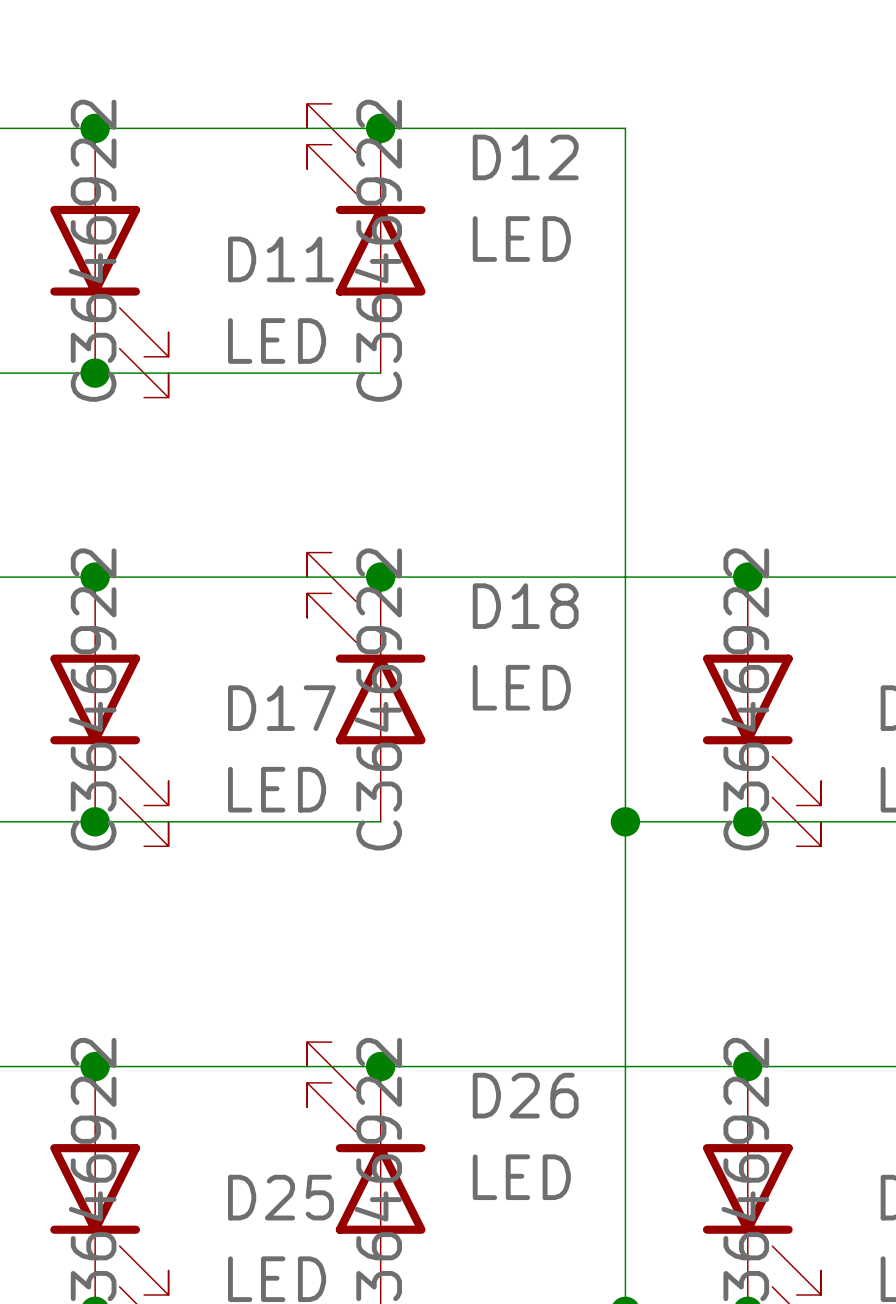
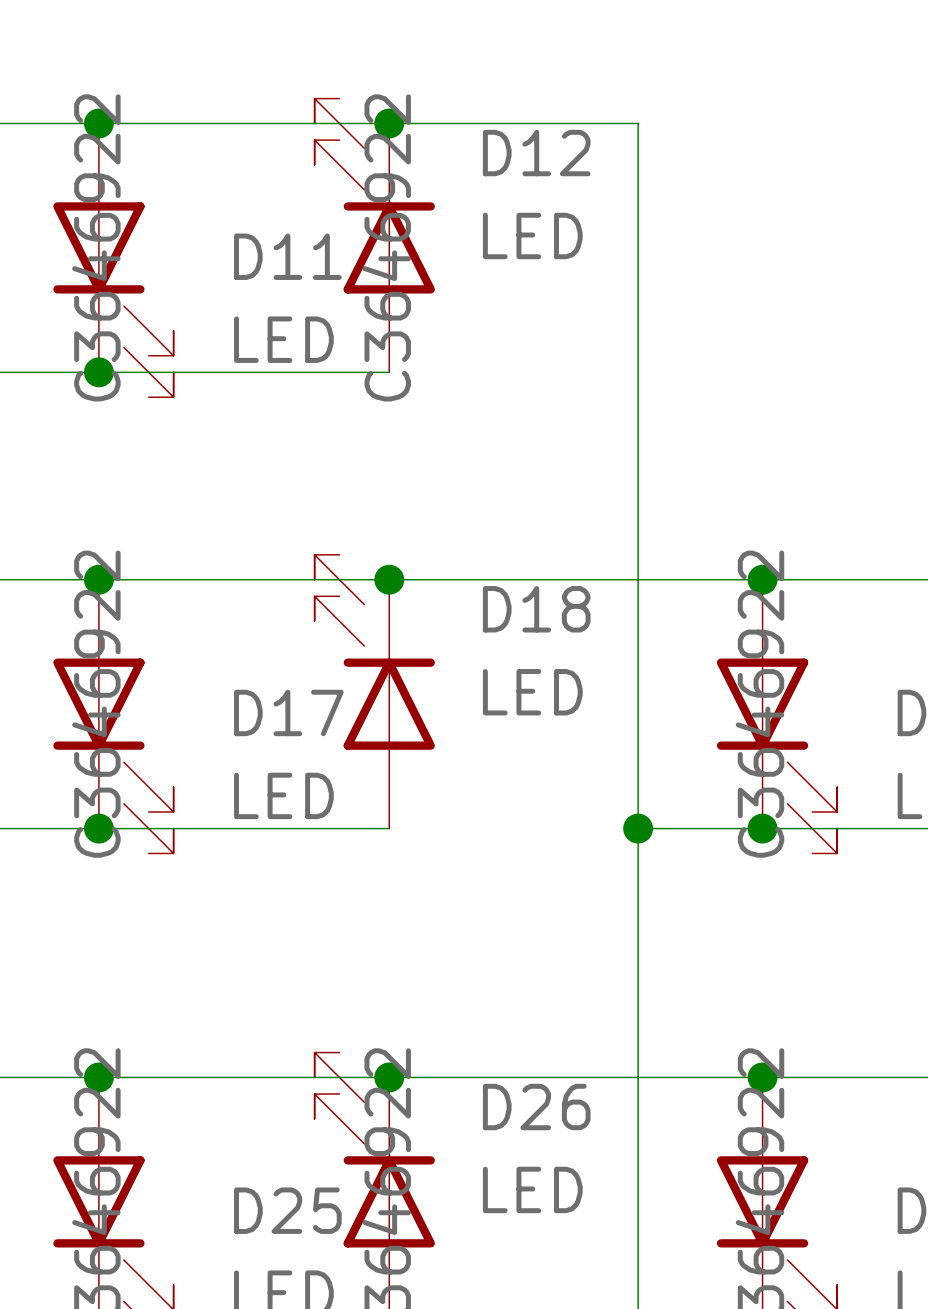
D18 text: C3646922 (378, 699) -> none

